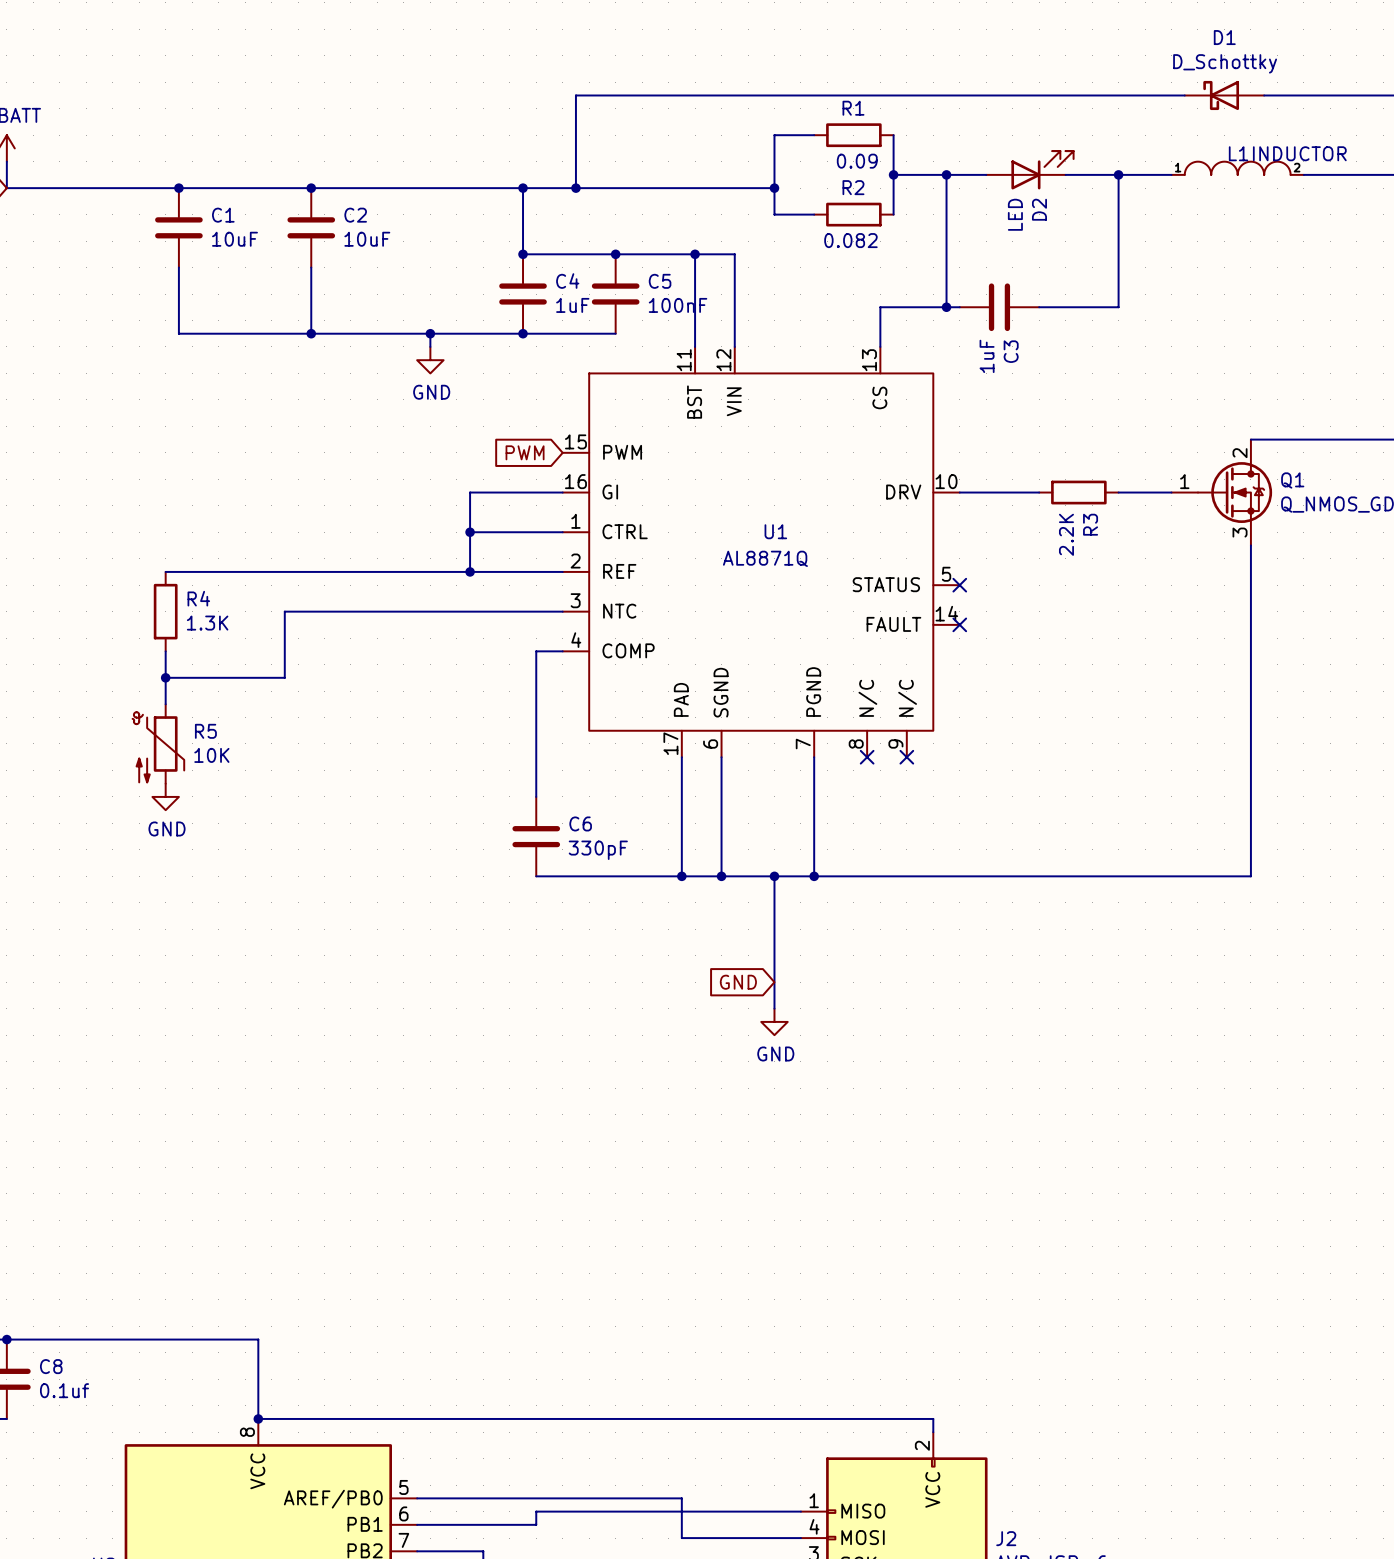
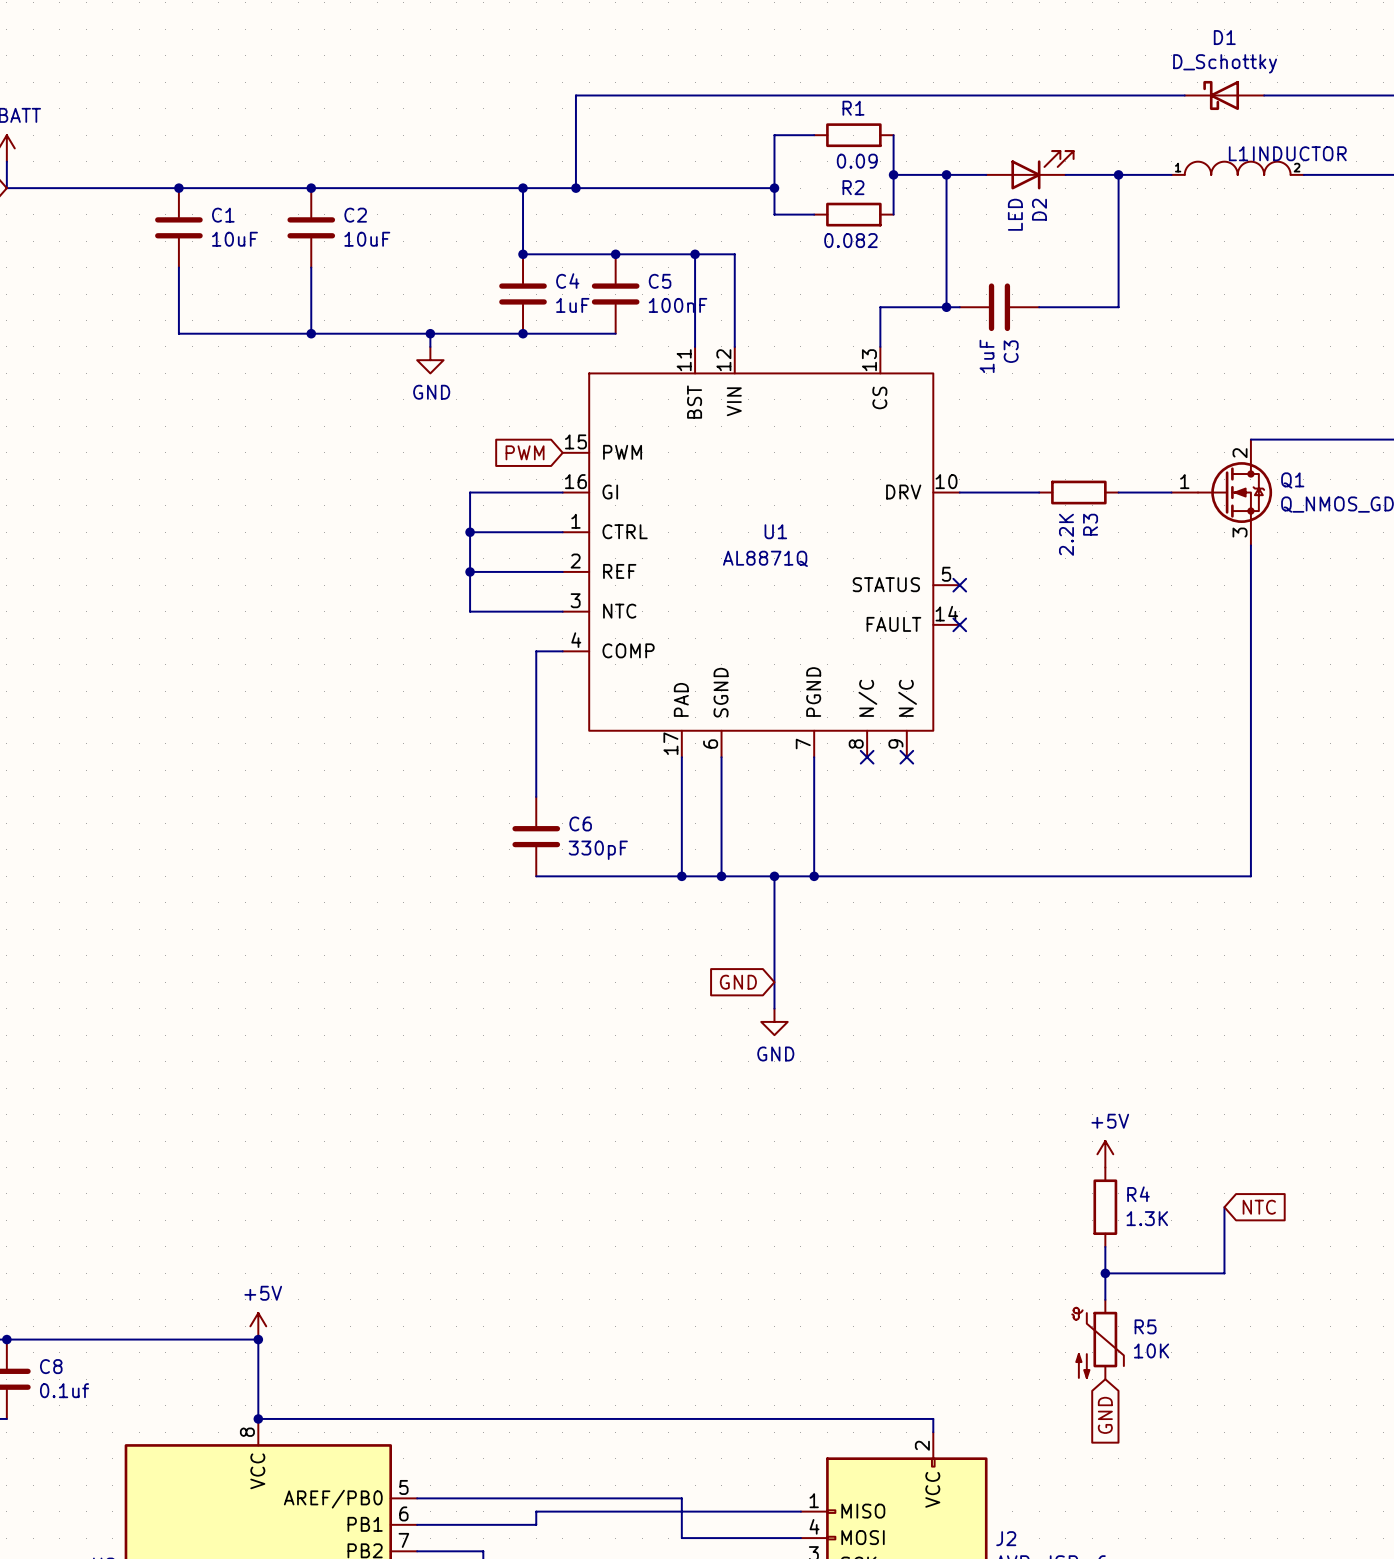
wire: (165, 571) (470, 571) -> (470, 611) (470, 571)
R4 position: (165, 611) -> (1105, 1207)
wire: (470, 611) (284, 611) (284, 677) (165, 677) -> none
wire: (165, 651) (165, 704) -> none
junction: (165, 677) -> none
R5 position: (158, 743) -> (1098, 1339)
power symbol: GND (165, 796) -> none
power symbol: none -> +5V (1105, 1154)
wire: none -> (1224, 1207) (1224, 1273) (1105, 1273)
global label: none -> NTC (1259, 1207)
wire: none -> (1105, 1246) (1105, 1299)
junction: none -> (1105, 1273)
power symbol: none -> +5V (258, 1326)
junction: none -> (258, 1339)
global label: none -> GND (1105, 1415)

